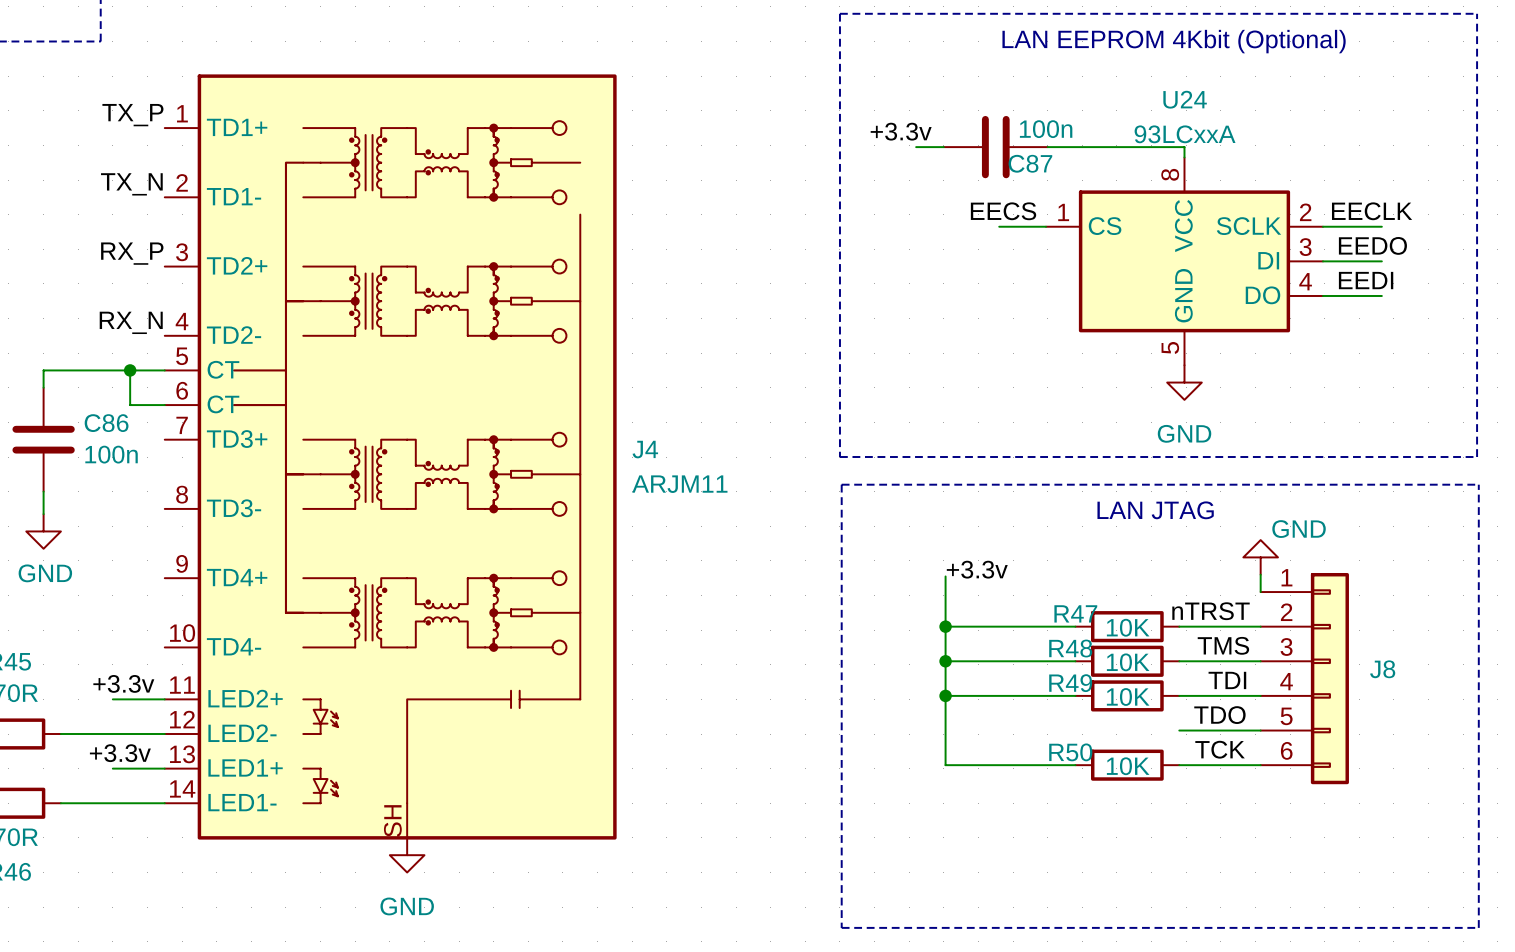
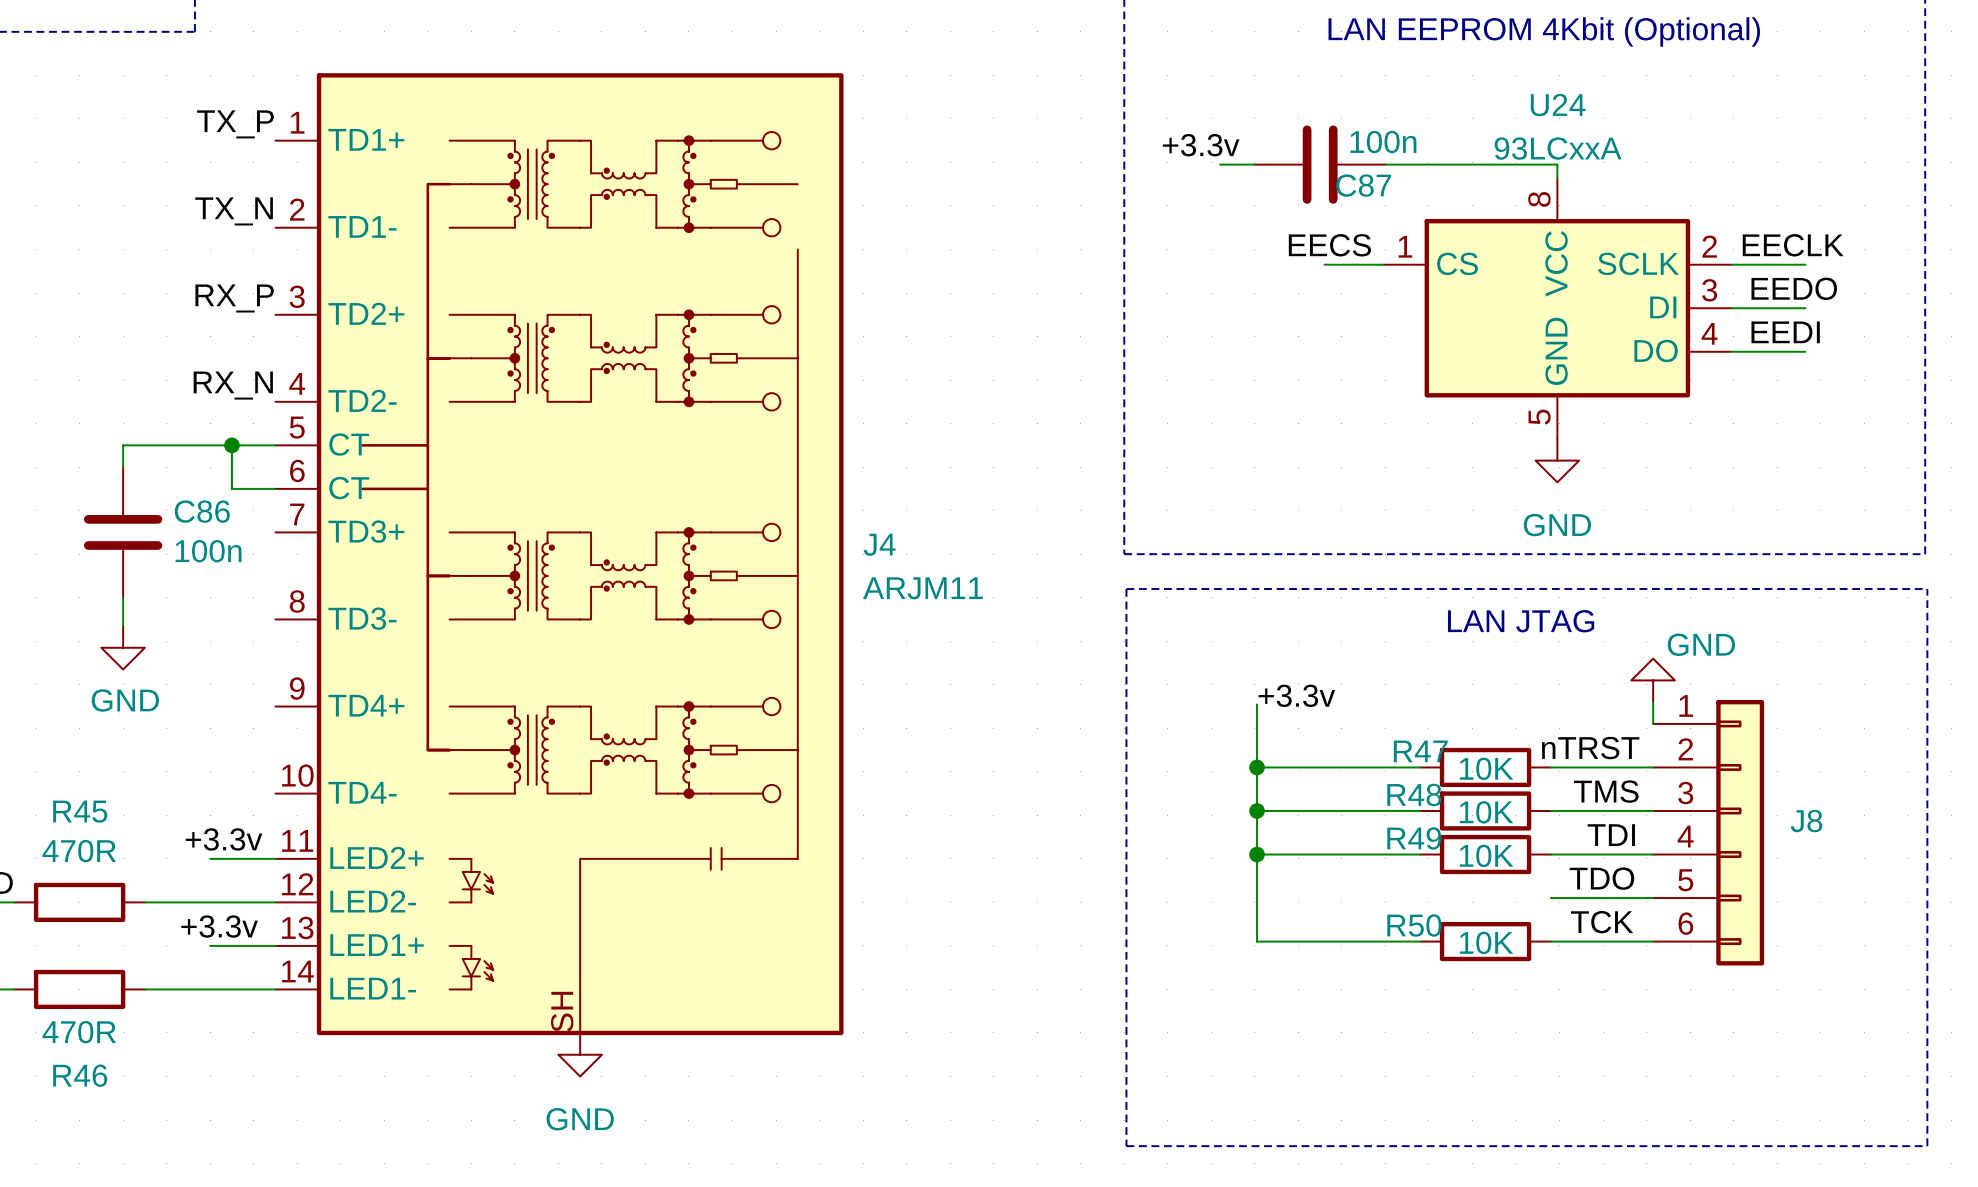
J4 symbol: [164, 74, 617, 840] -> [275, 73, 844, 1036]

